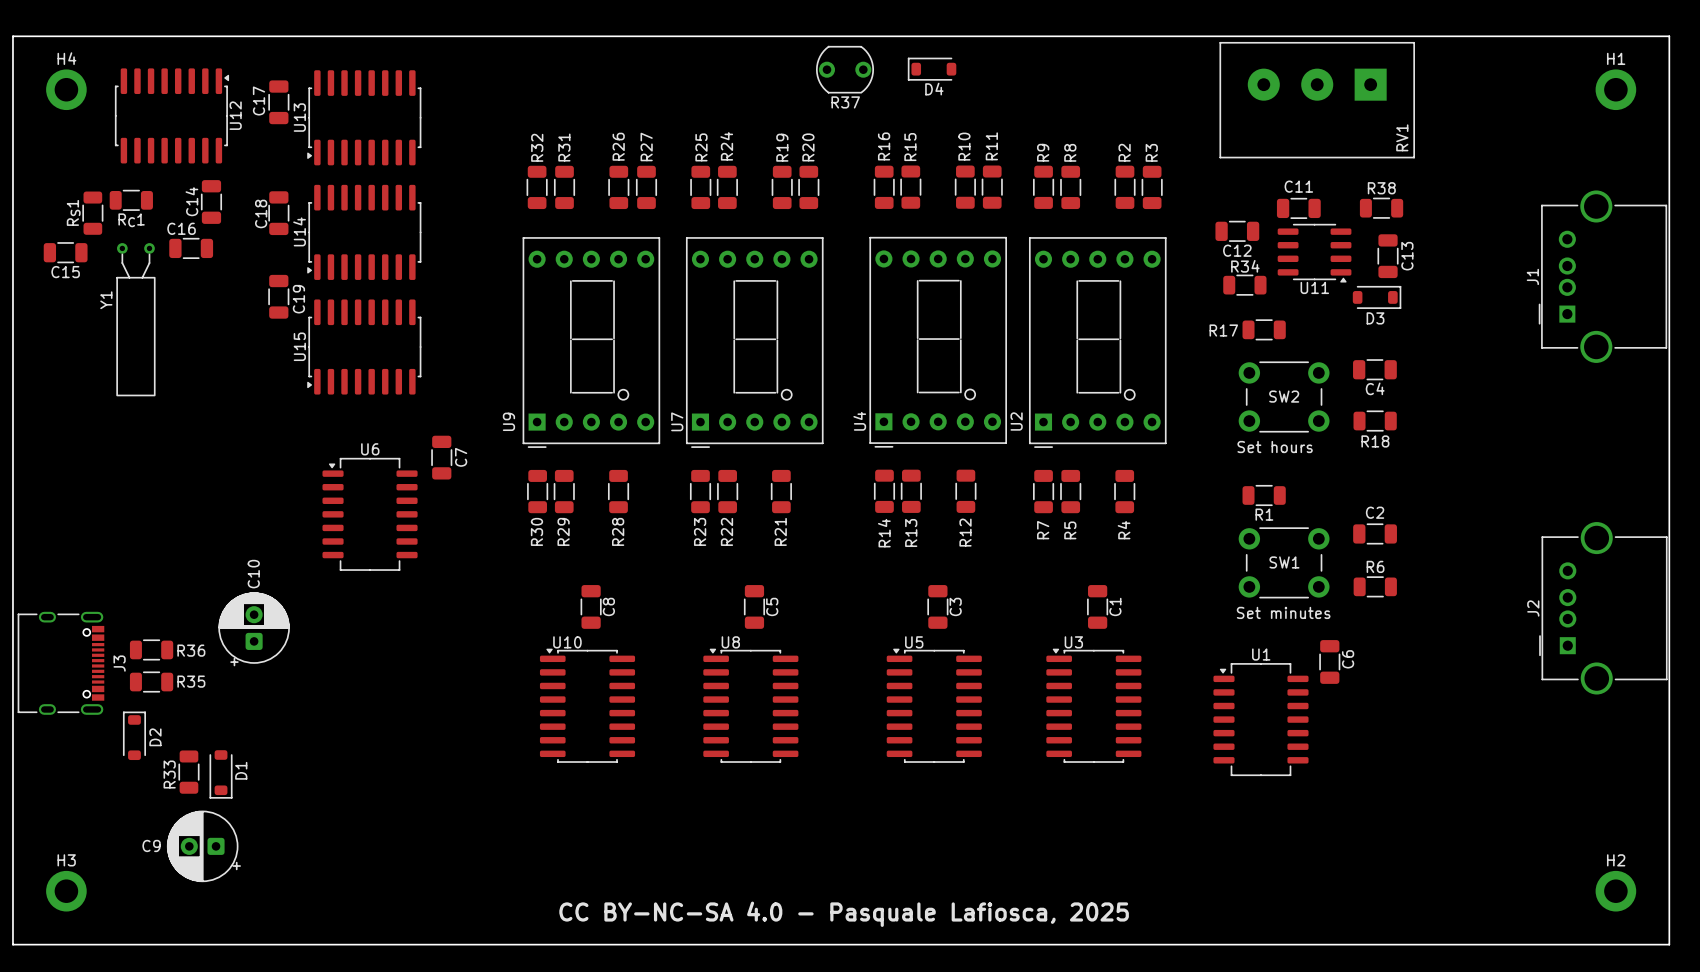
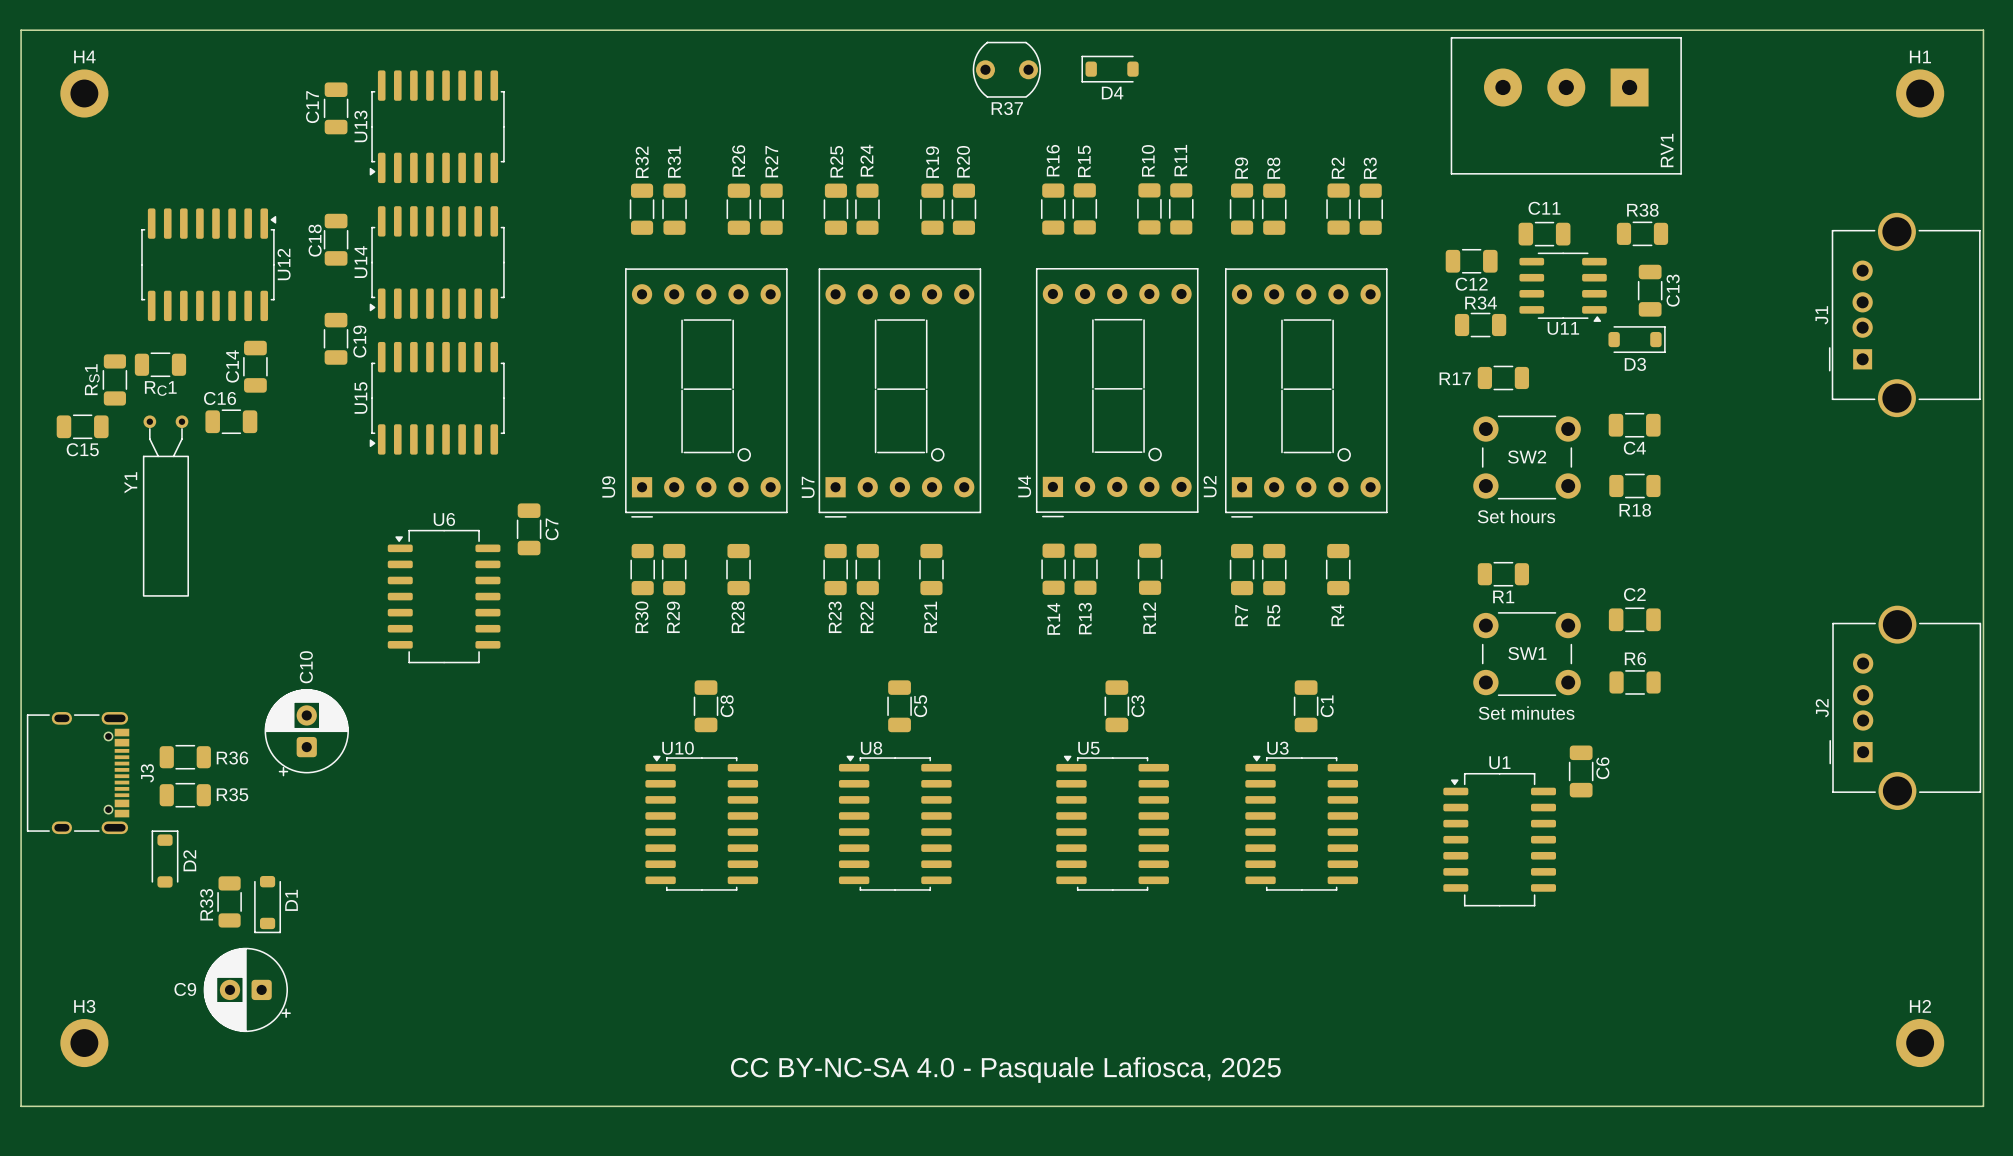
U12 position: (172, 115) -> (208, 264)
RC1 position: (131, 200) -> (160, 364)
C14 position: (211, 202) -> (255, 366)
RS1 position: (92, 213) -> (114, 379)
C16 position: (191, 248) -> (231, 421)
C15 position: (65, 252) -> (82, 426)
Y1 position: (135, 319) -> (165, 506)

